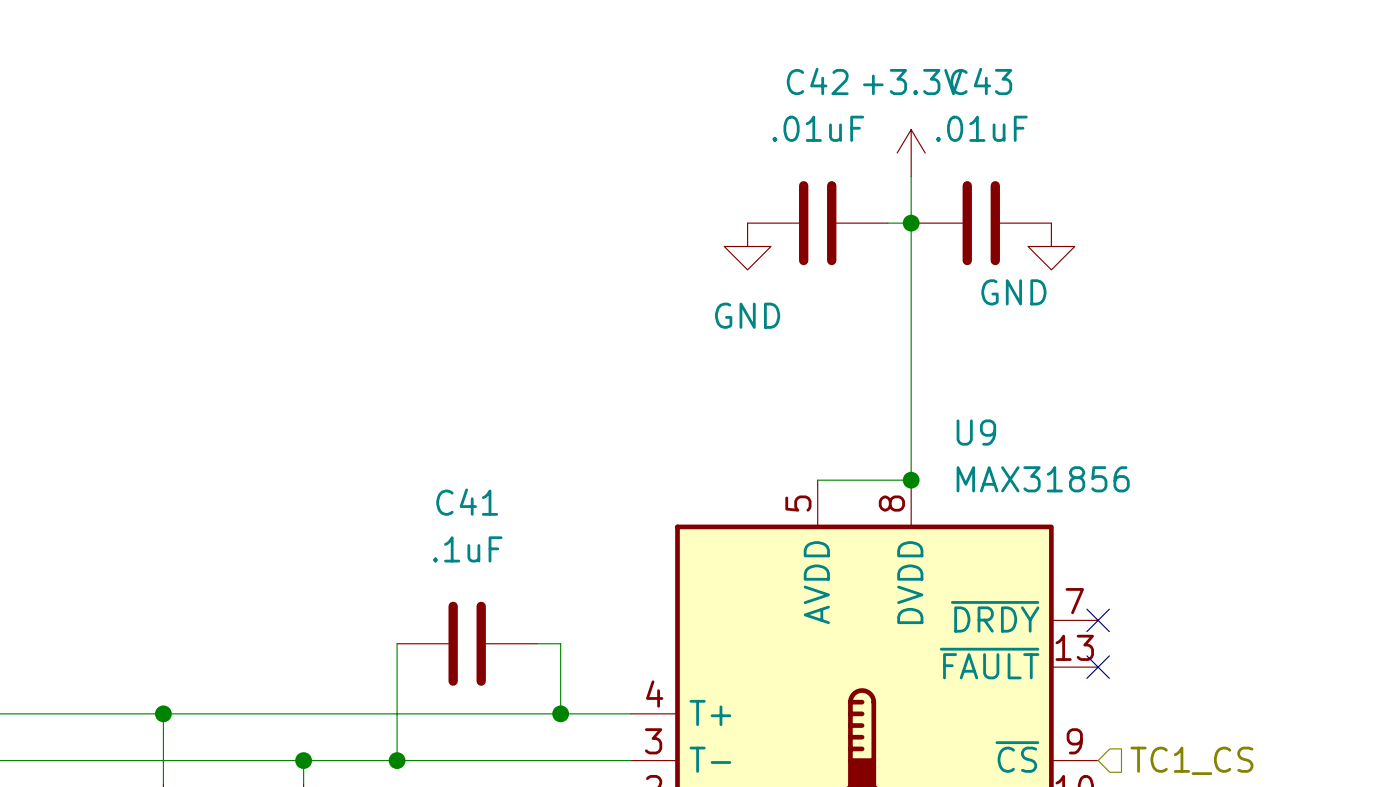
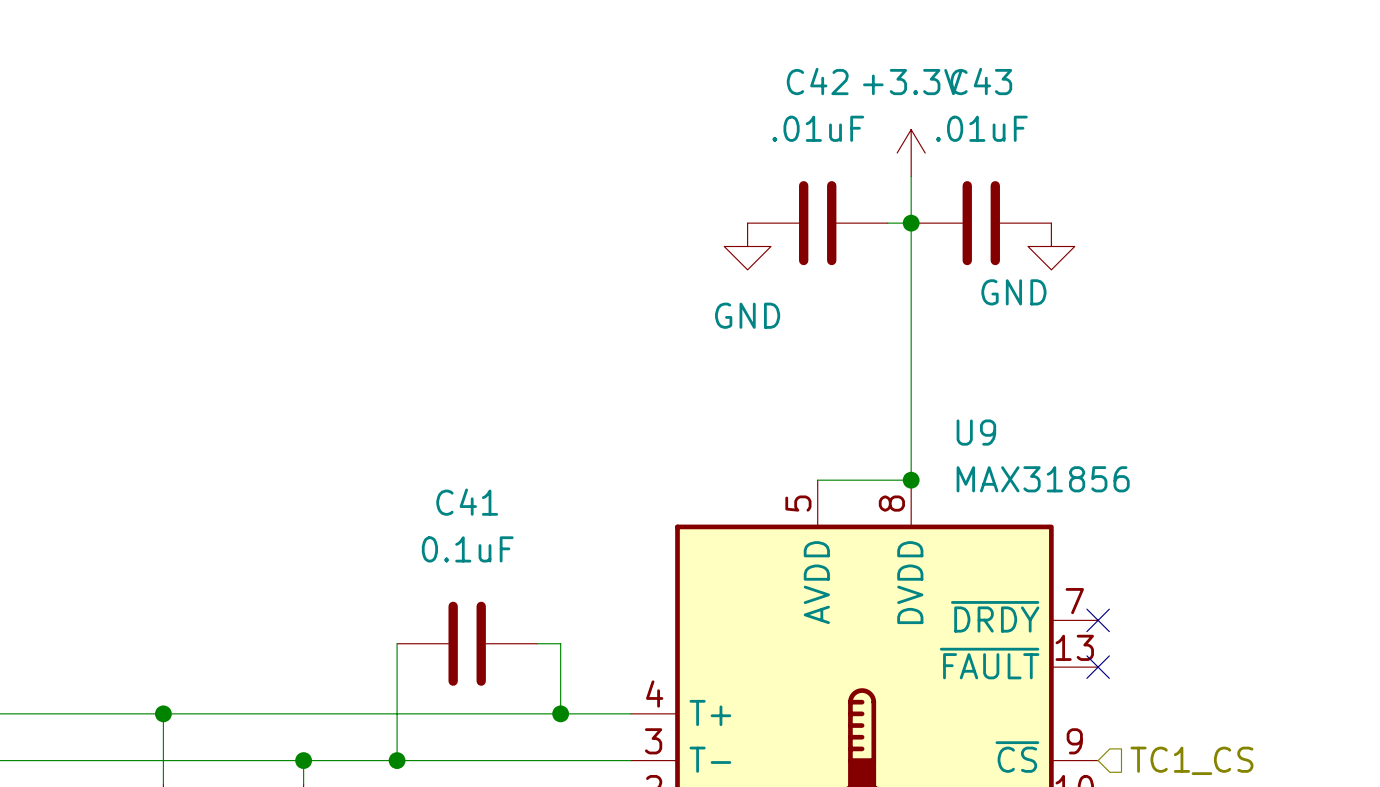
C41 value: .1uF (467, 549) -> 0.1uF (467, 549)

